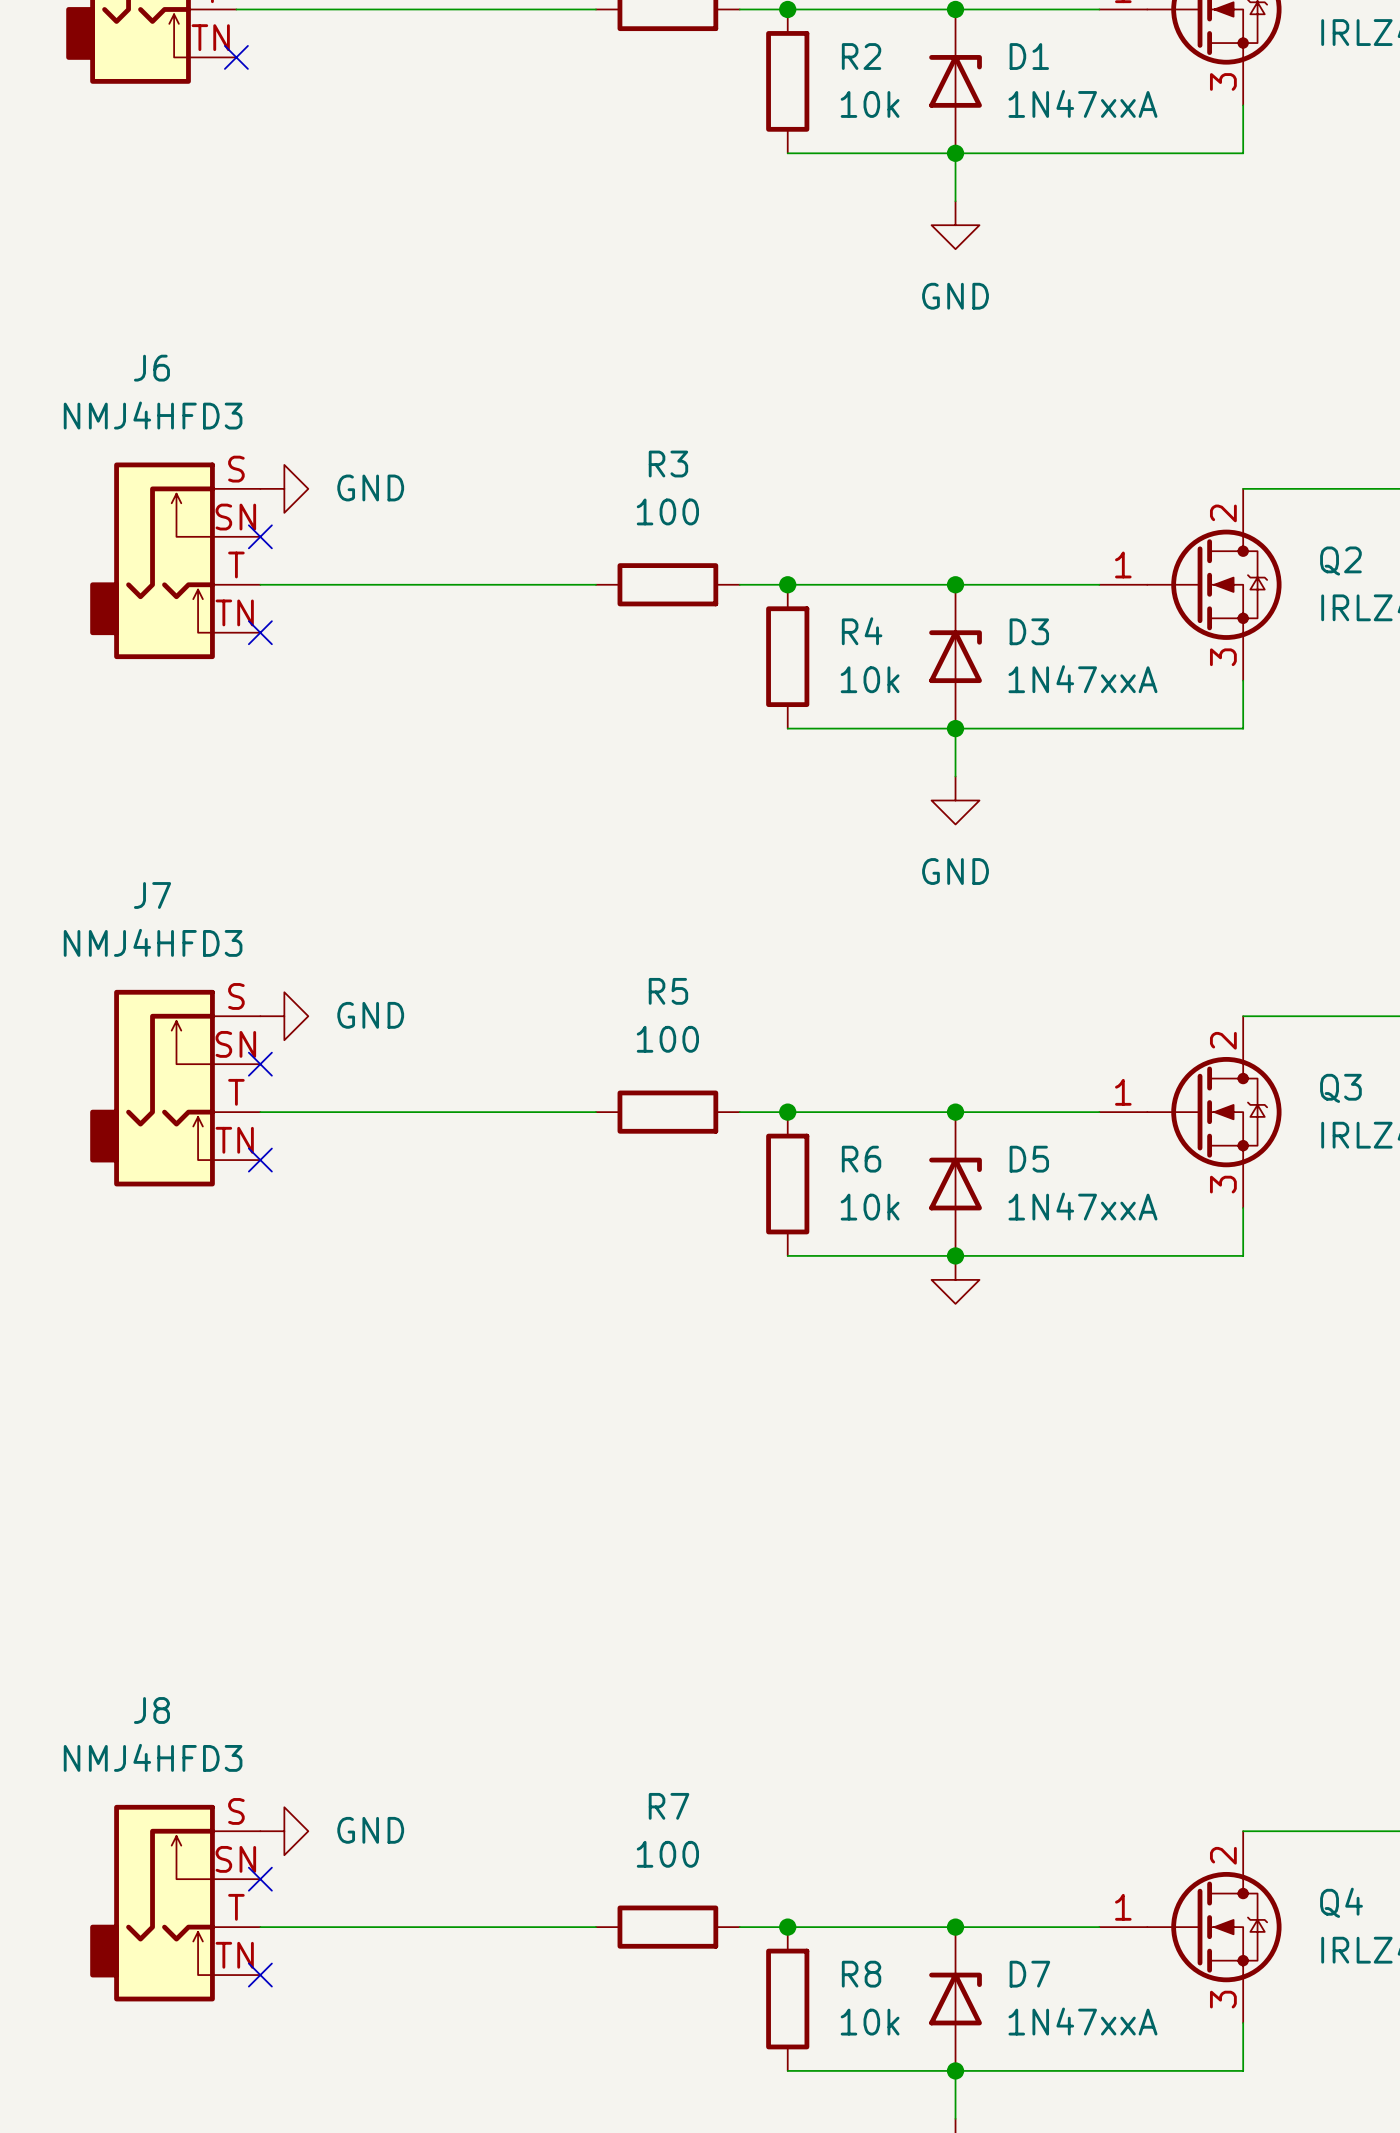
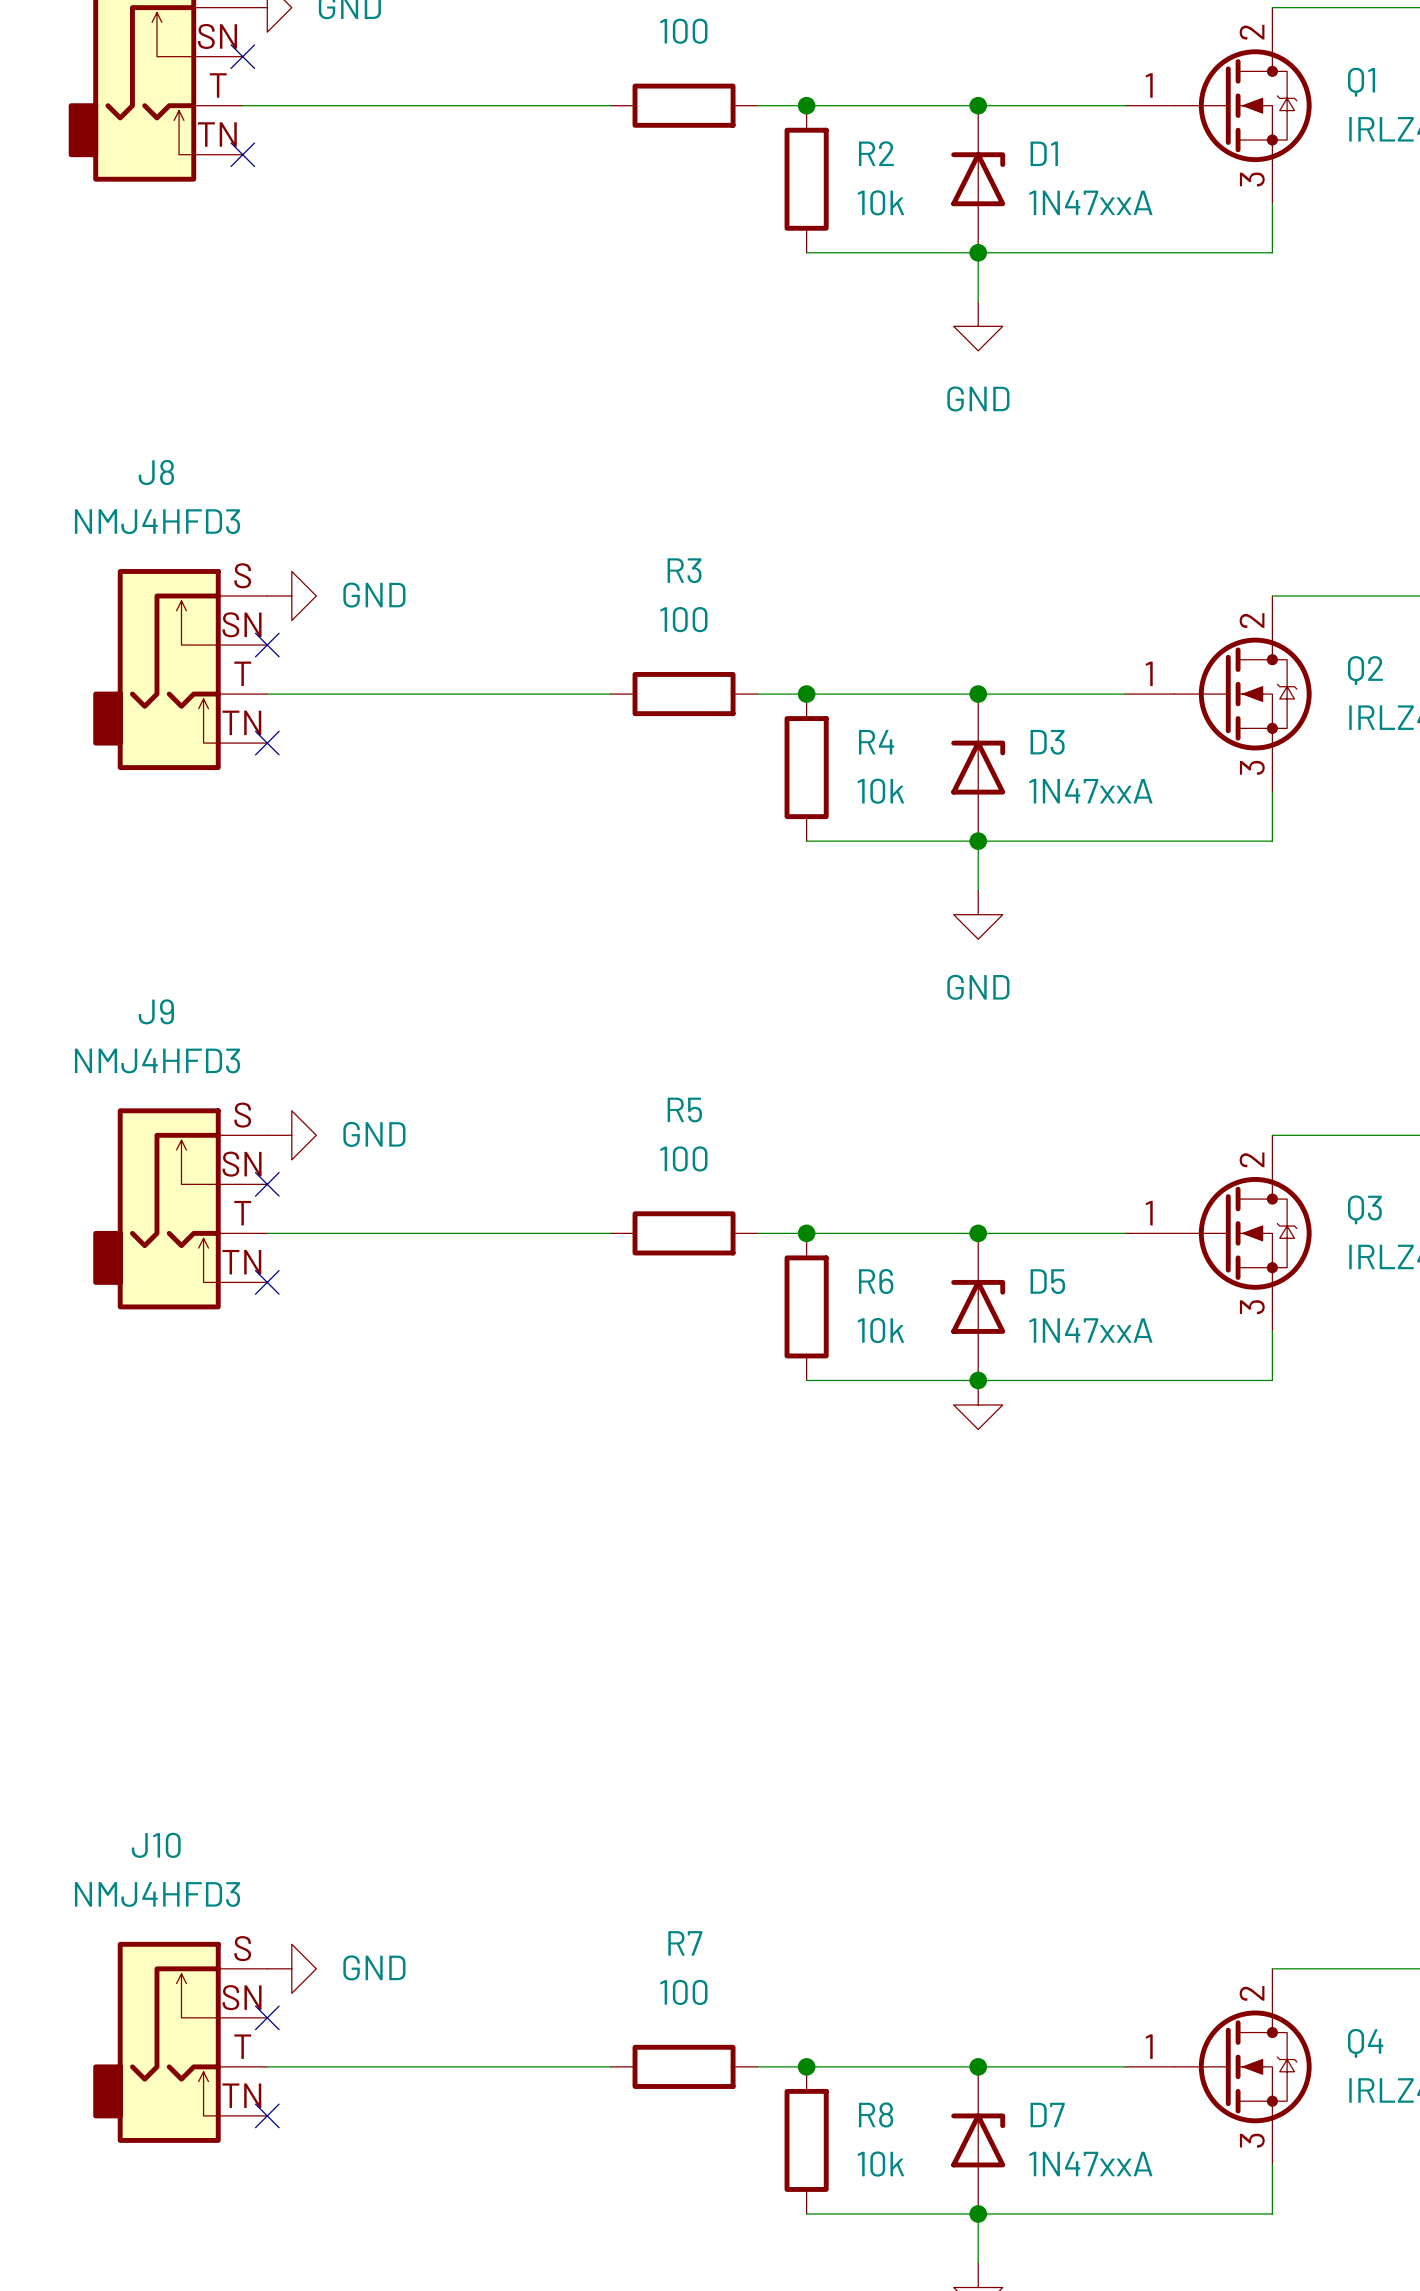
J6 name: J6 (151, 368) -> J8 (156, 472)
J7 name: J7 (152, 895) -> J9 (156, 1011)
J8 name: J8 (151, 1710) -> J10 (156, 1845)

